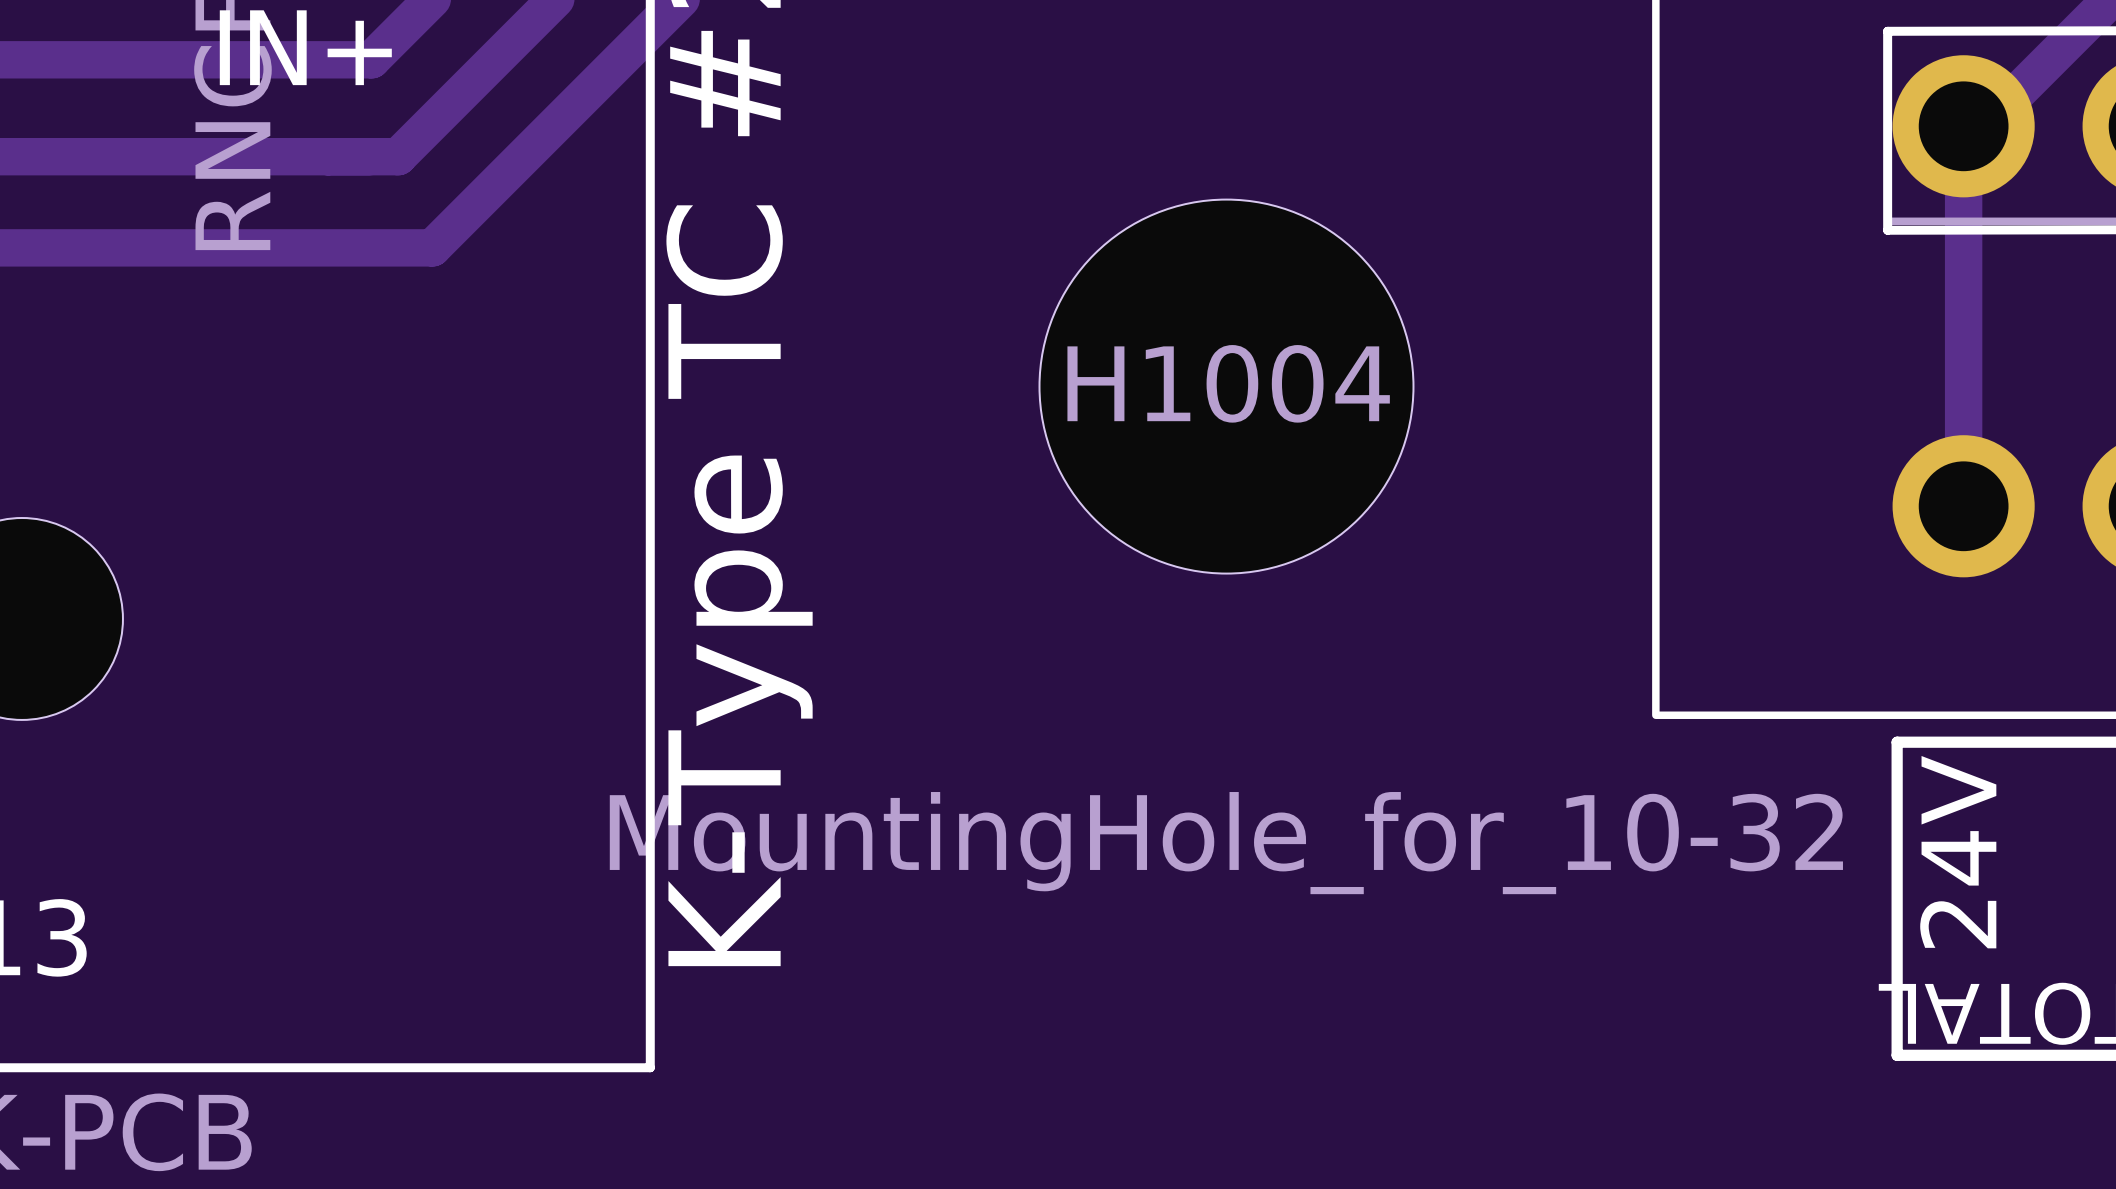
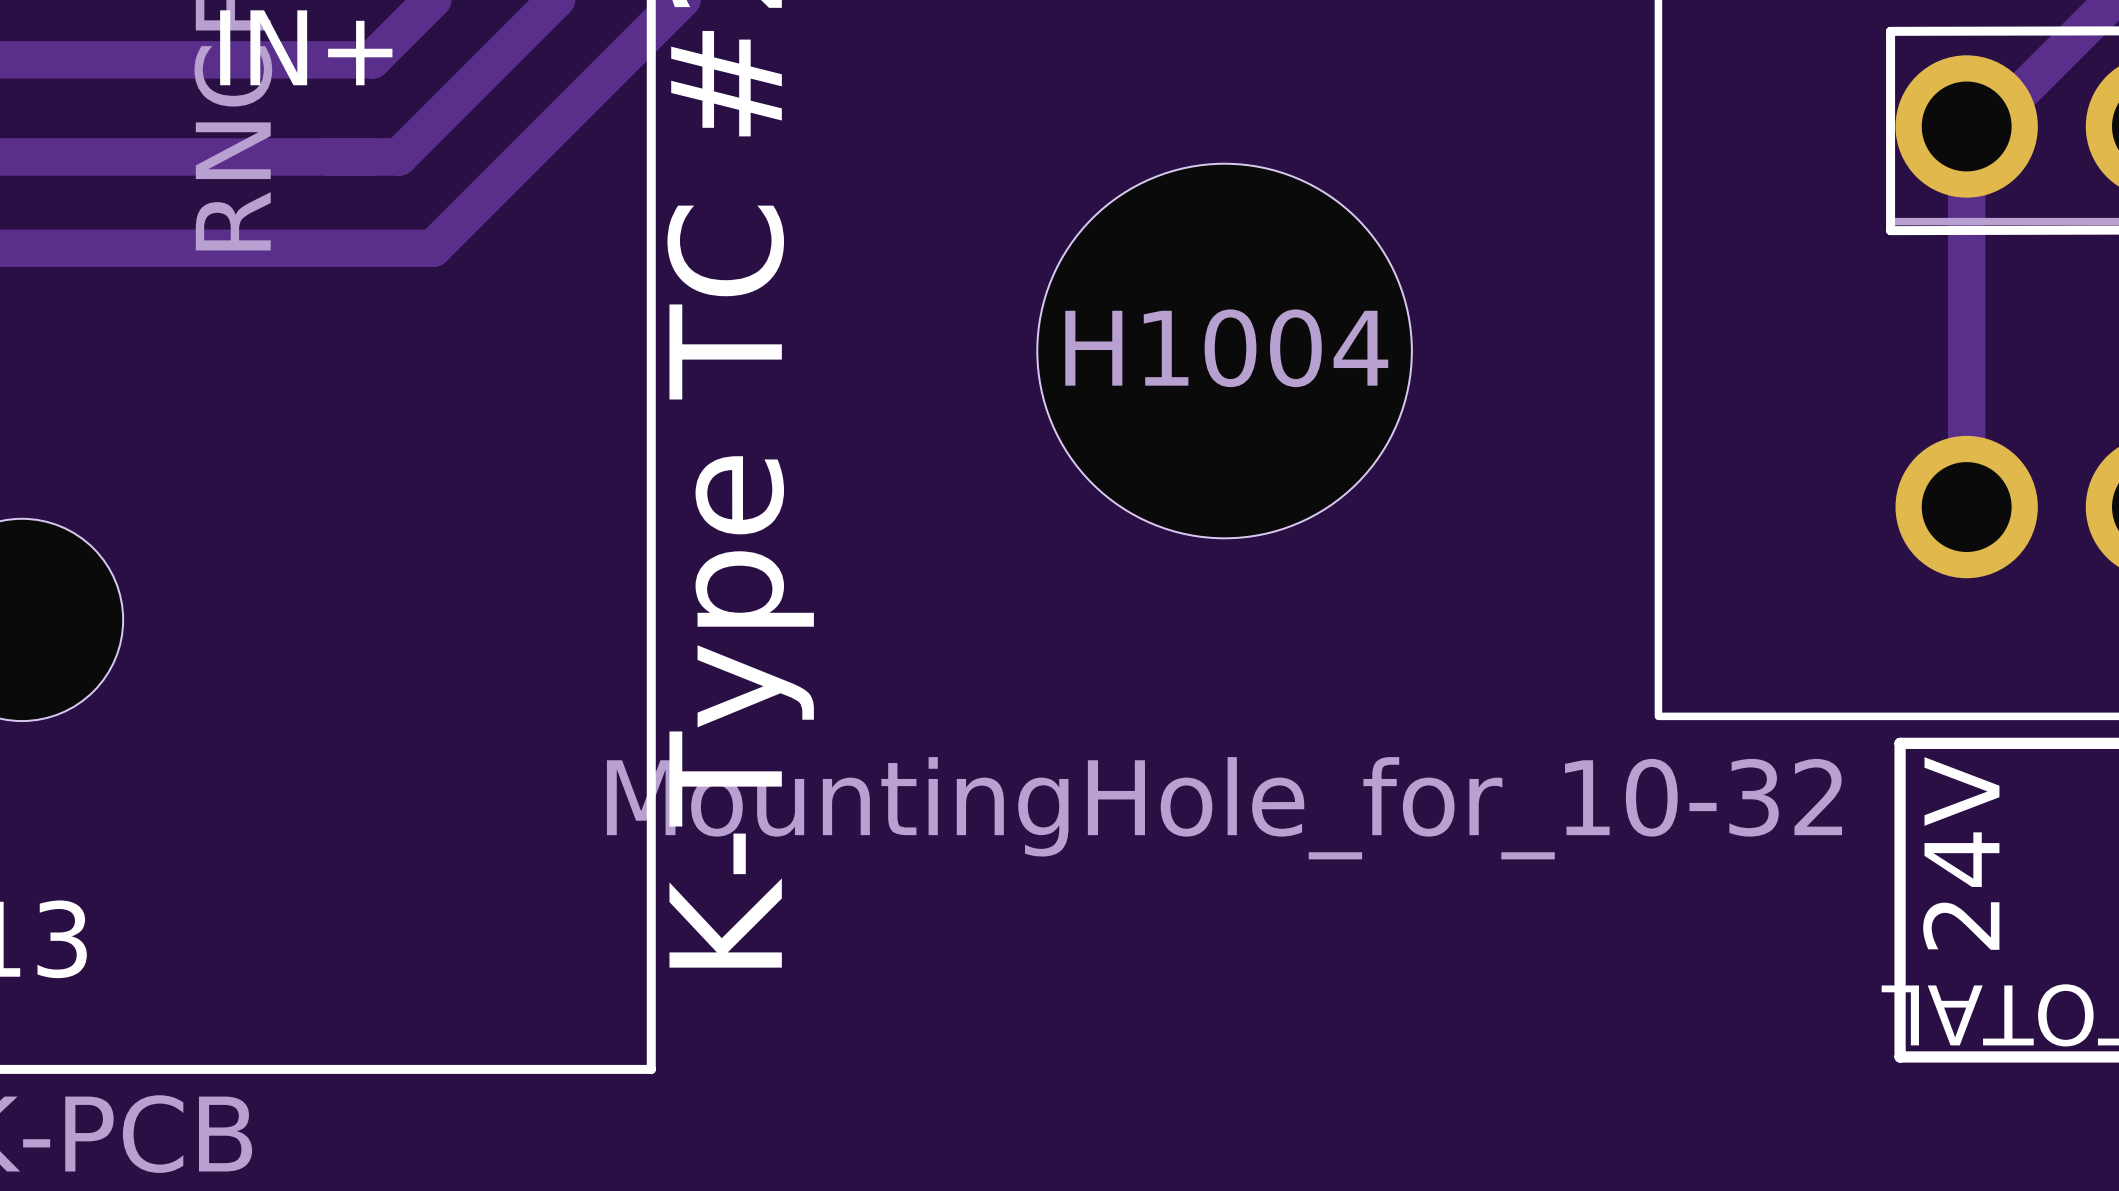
H1004 position: (1226, 386) -> (1224, 351)

